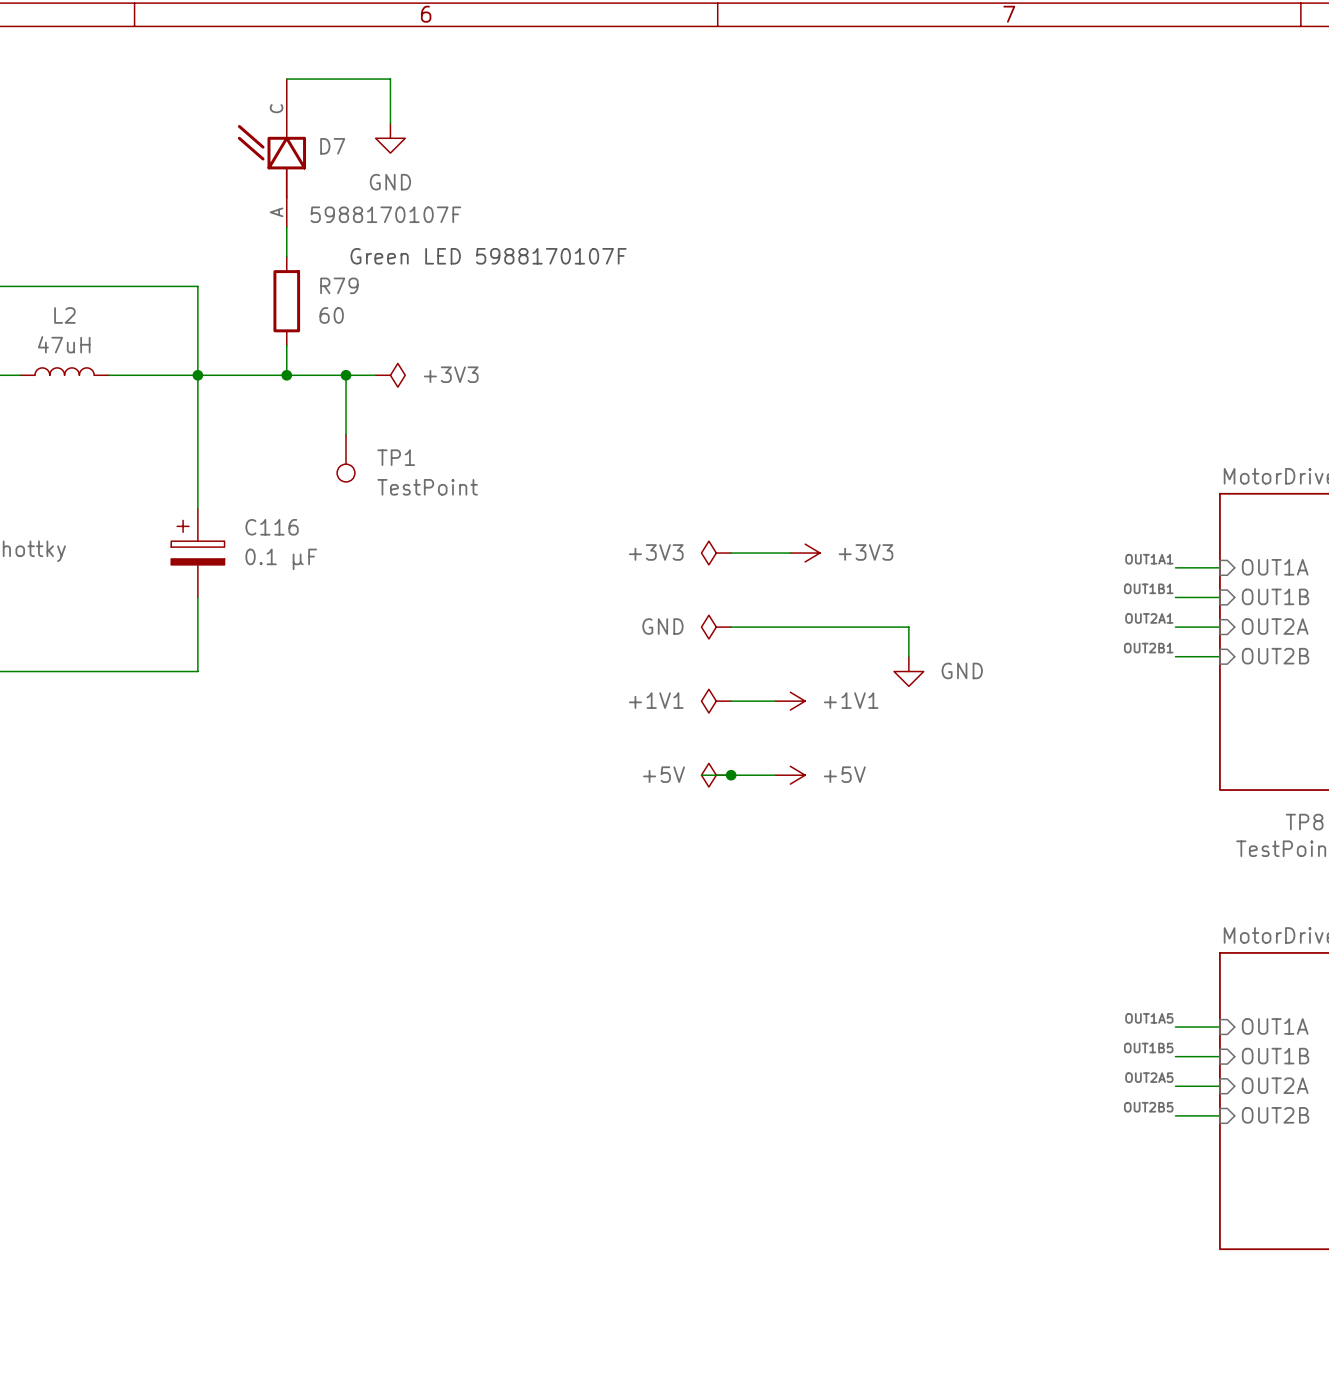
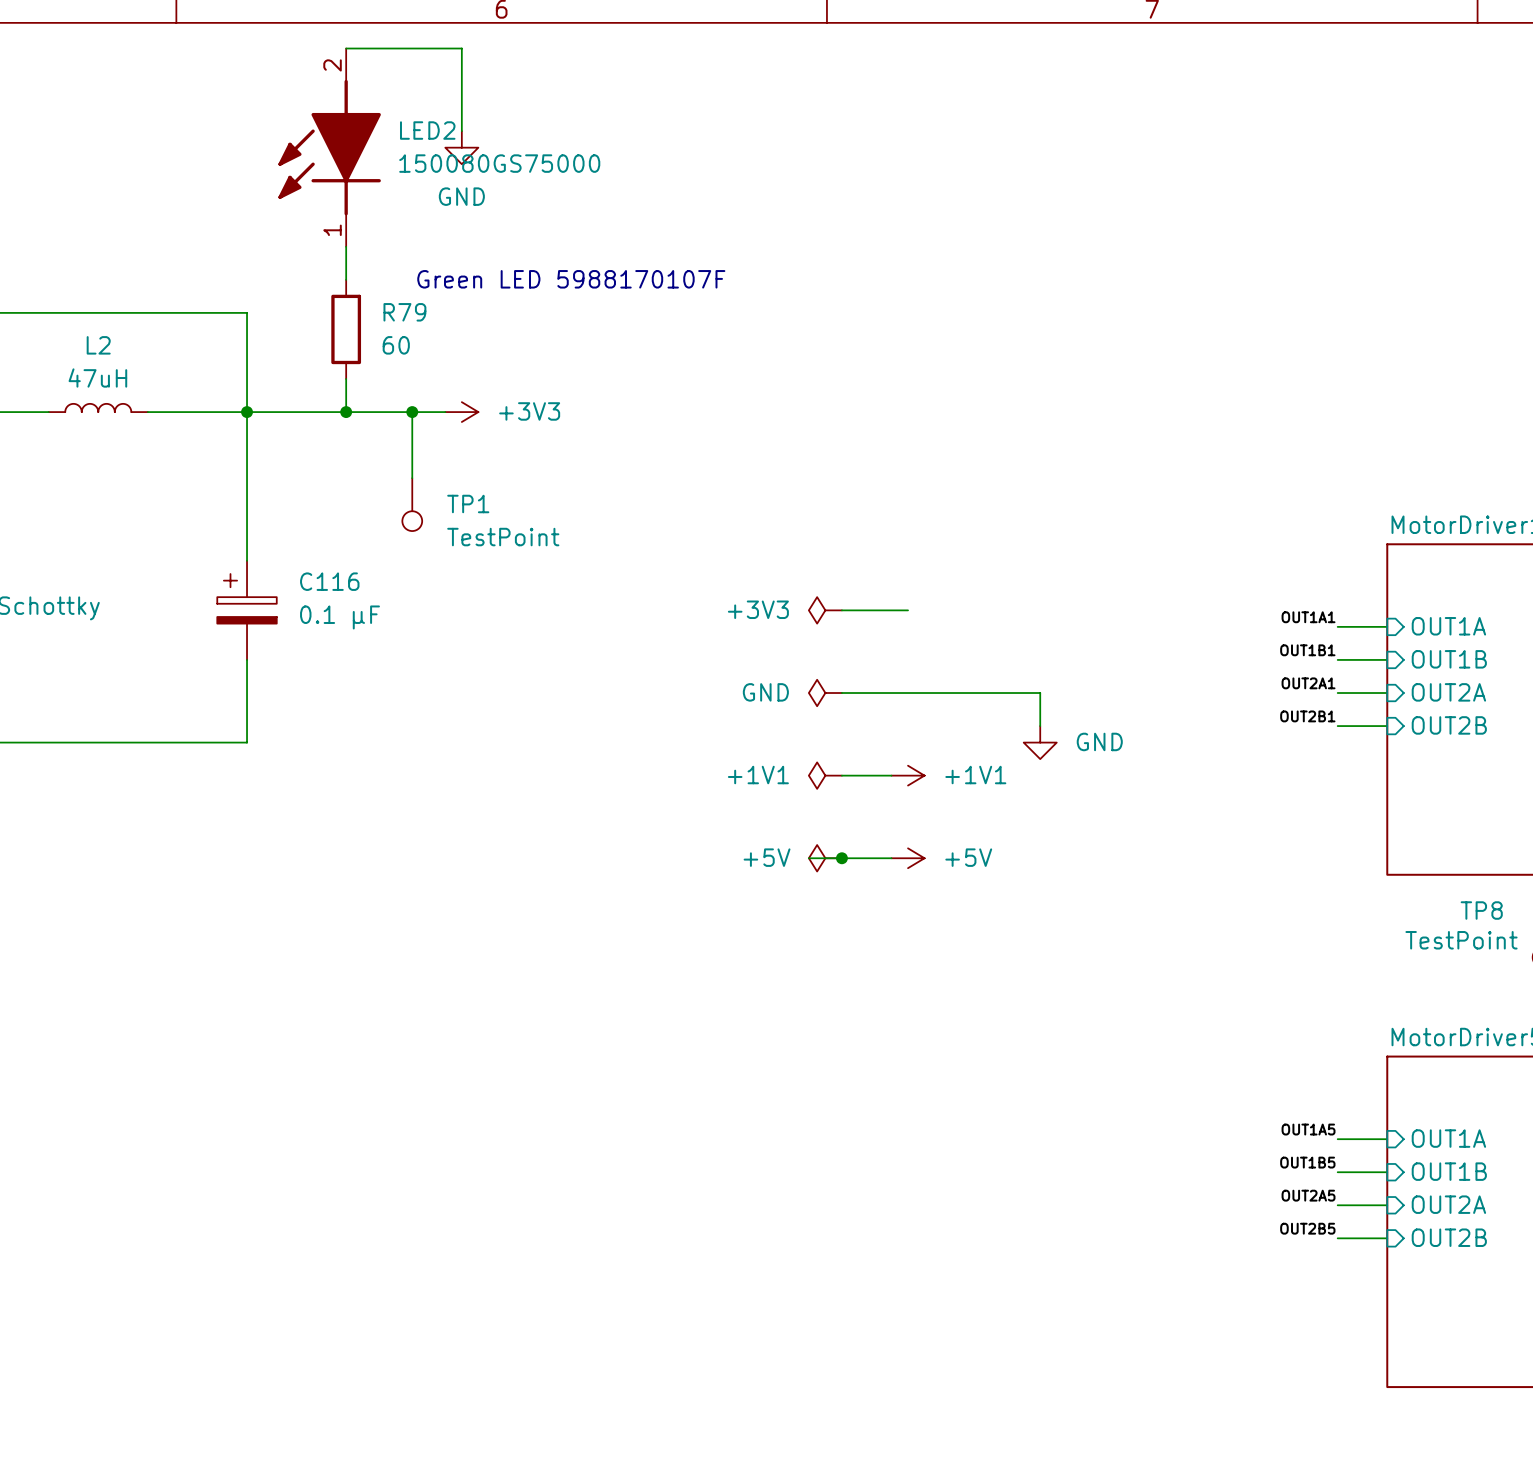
wire: (286, 79) (390, 79) -> (346, 48) (461, 48) (461, 81)
LED2: none -> 150080GS75000 (329, 147)
D7: 5988170107F (271, 153) -> none
power symbol shape: [375, 363, 406, 388] -> [445, 402, 479, 422]
power symbol: +3V3 (805, 553) -> none

